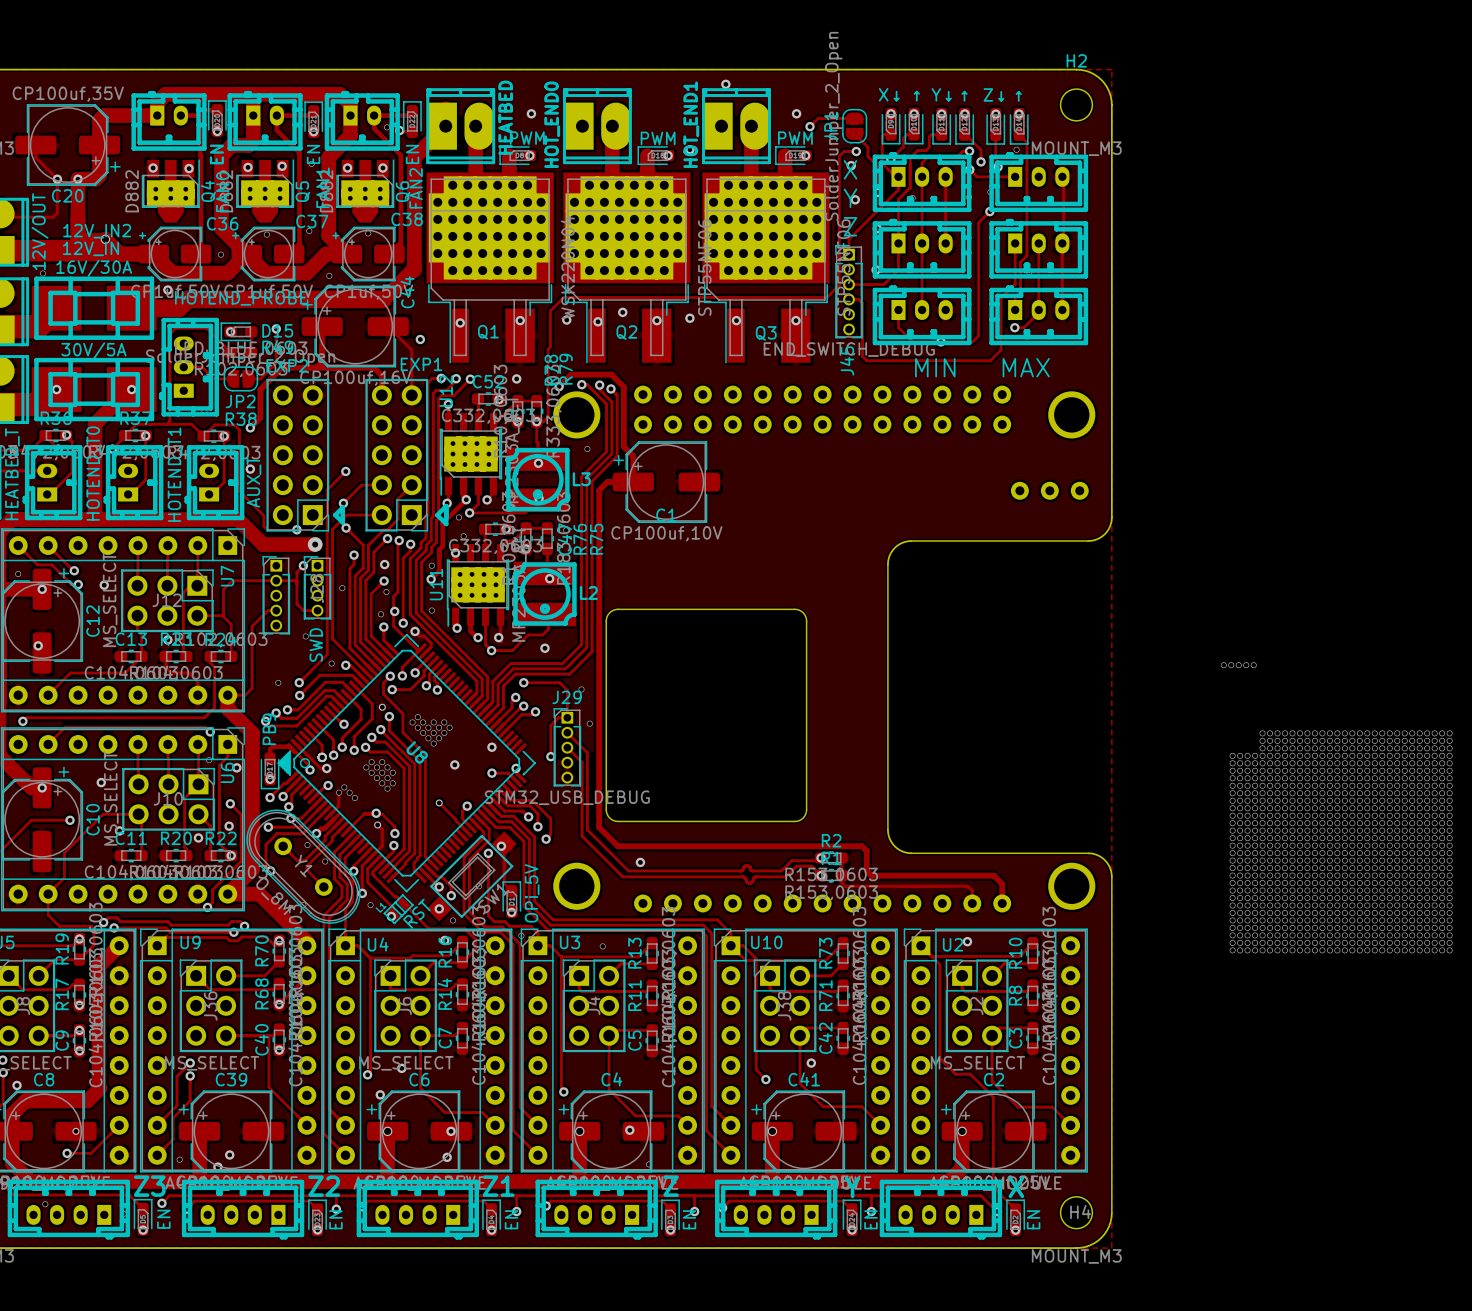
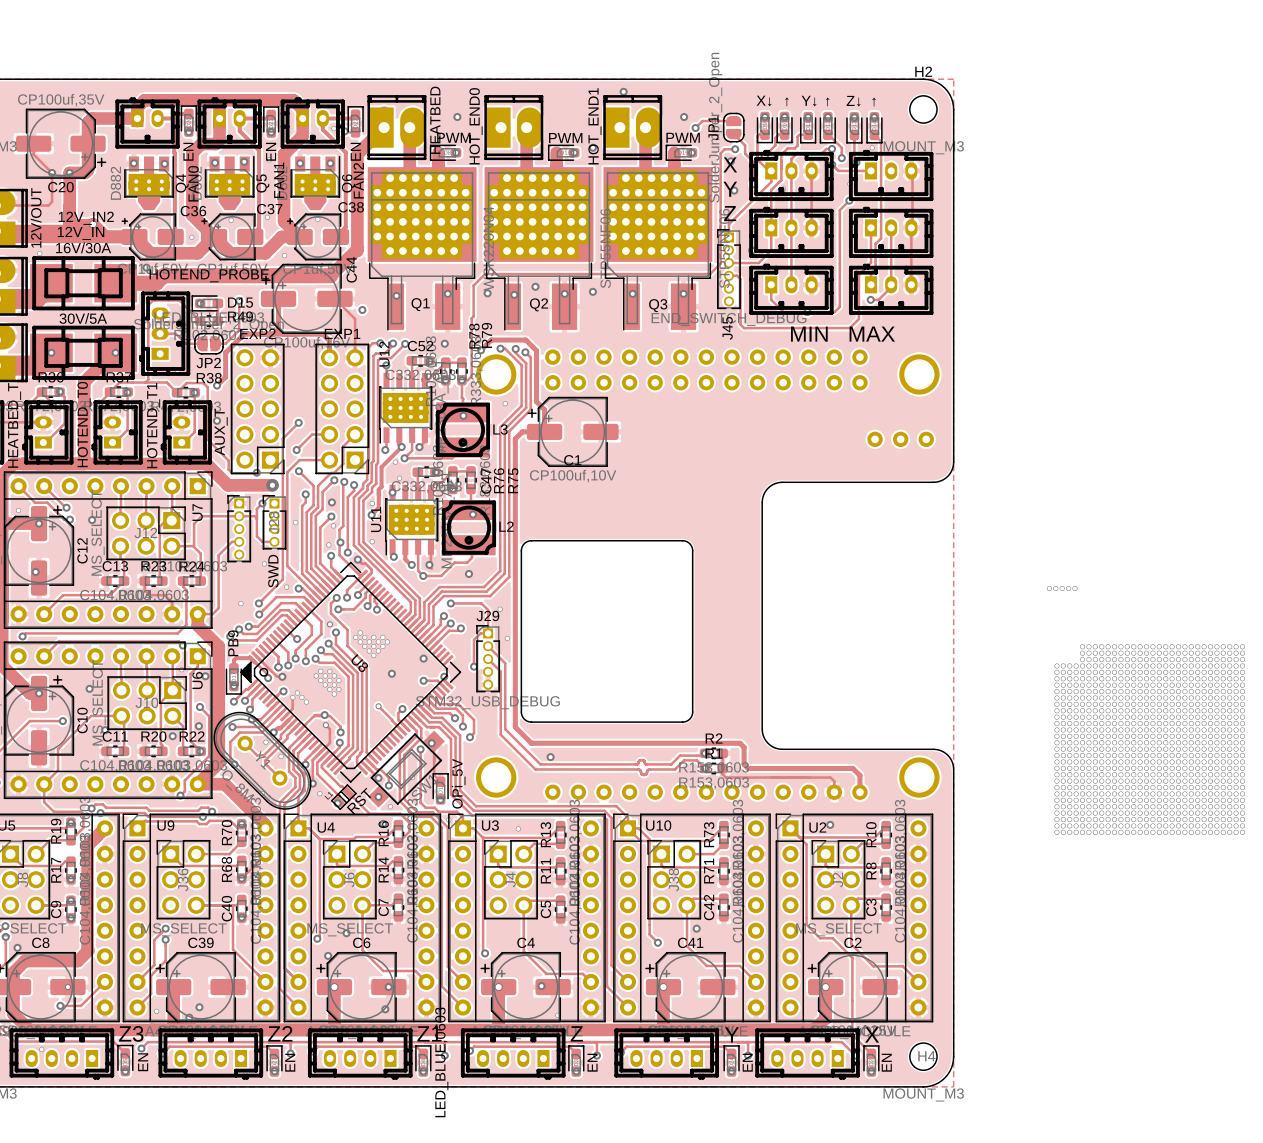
part footprint: [266, 378, 345, 532] -> [230, 343, 285, 475]
part footprint: [365, 378, 449, 532] -> [315, 343, 370, 475]
part value: EN (511, 1219) -> LED_BLUE,0603 (441, 1062)

